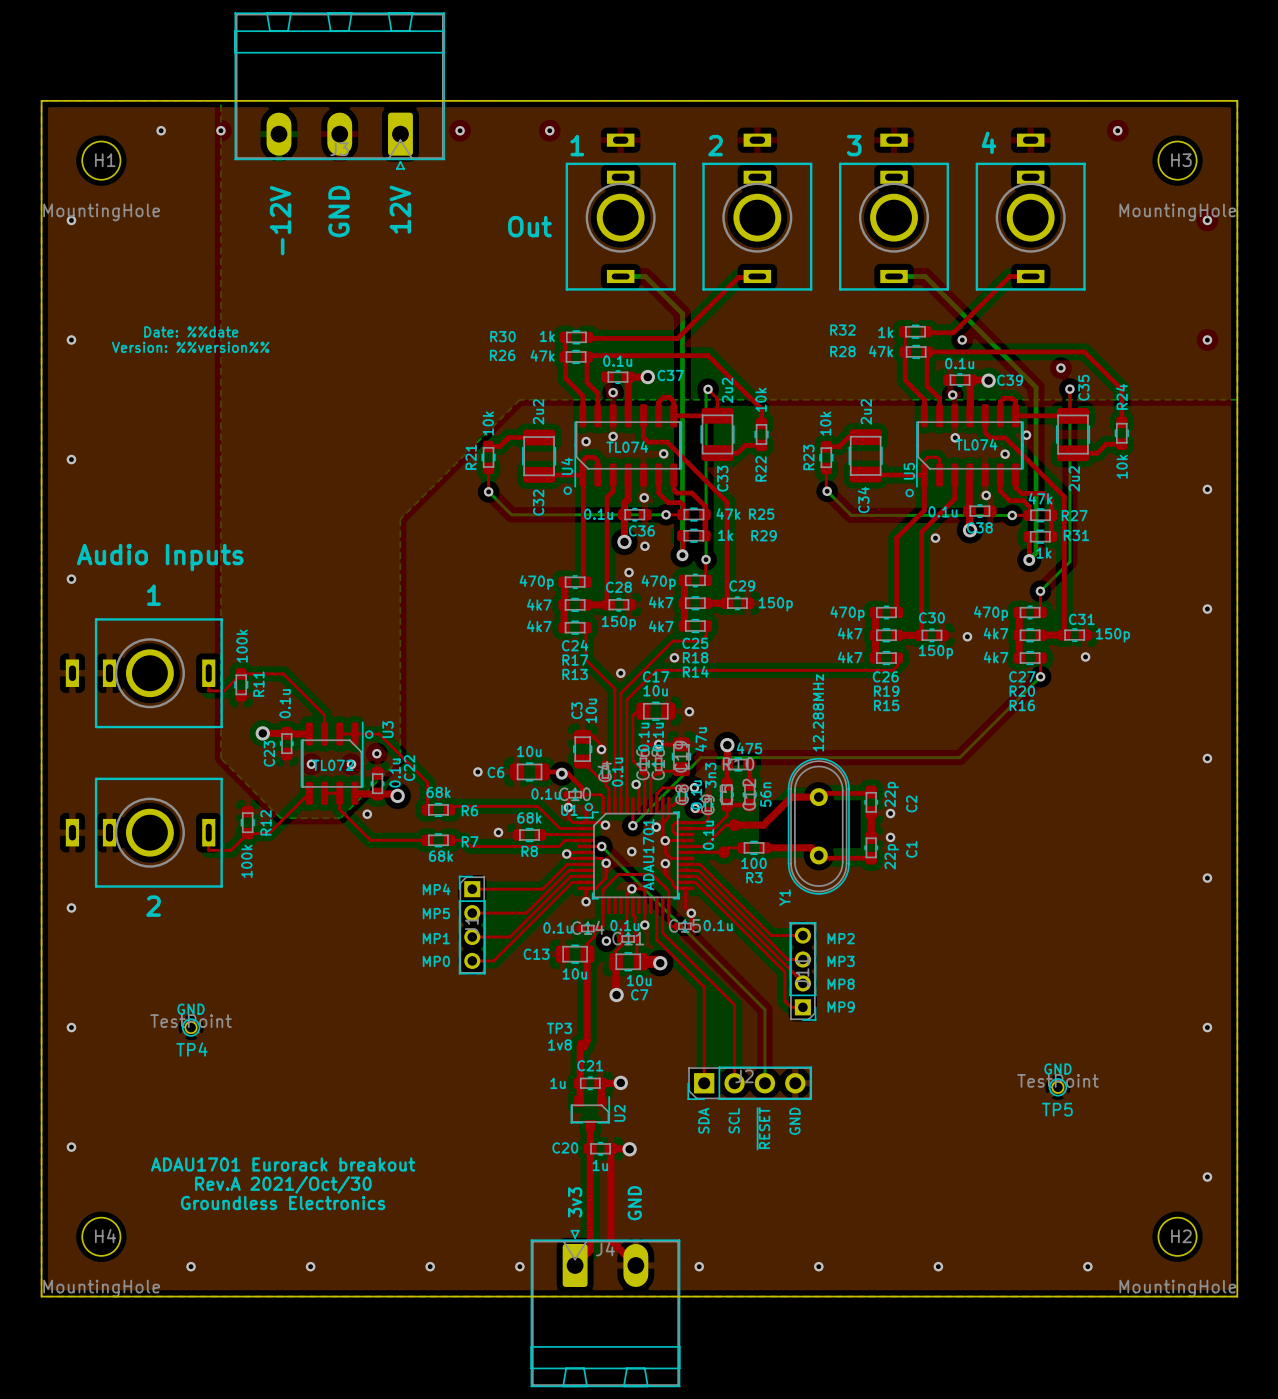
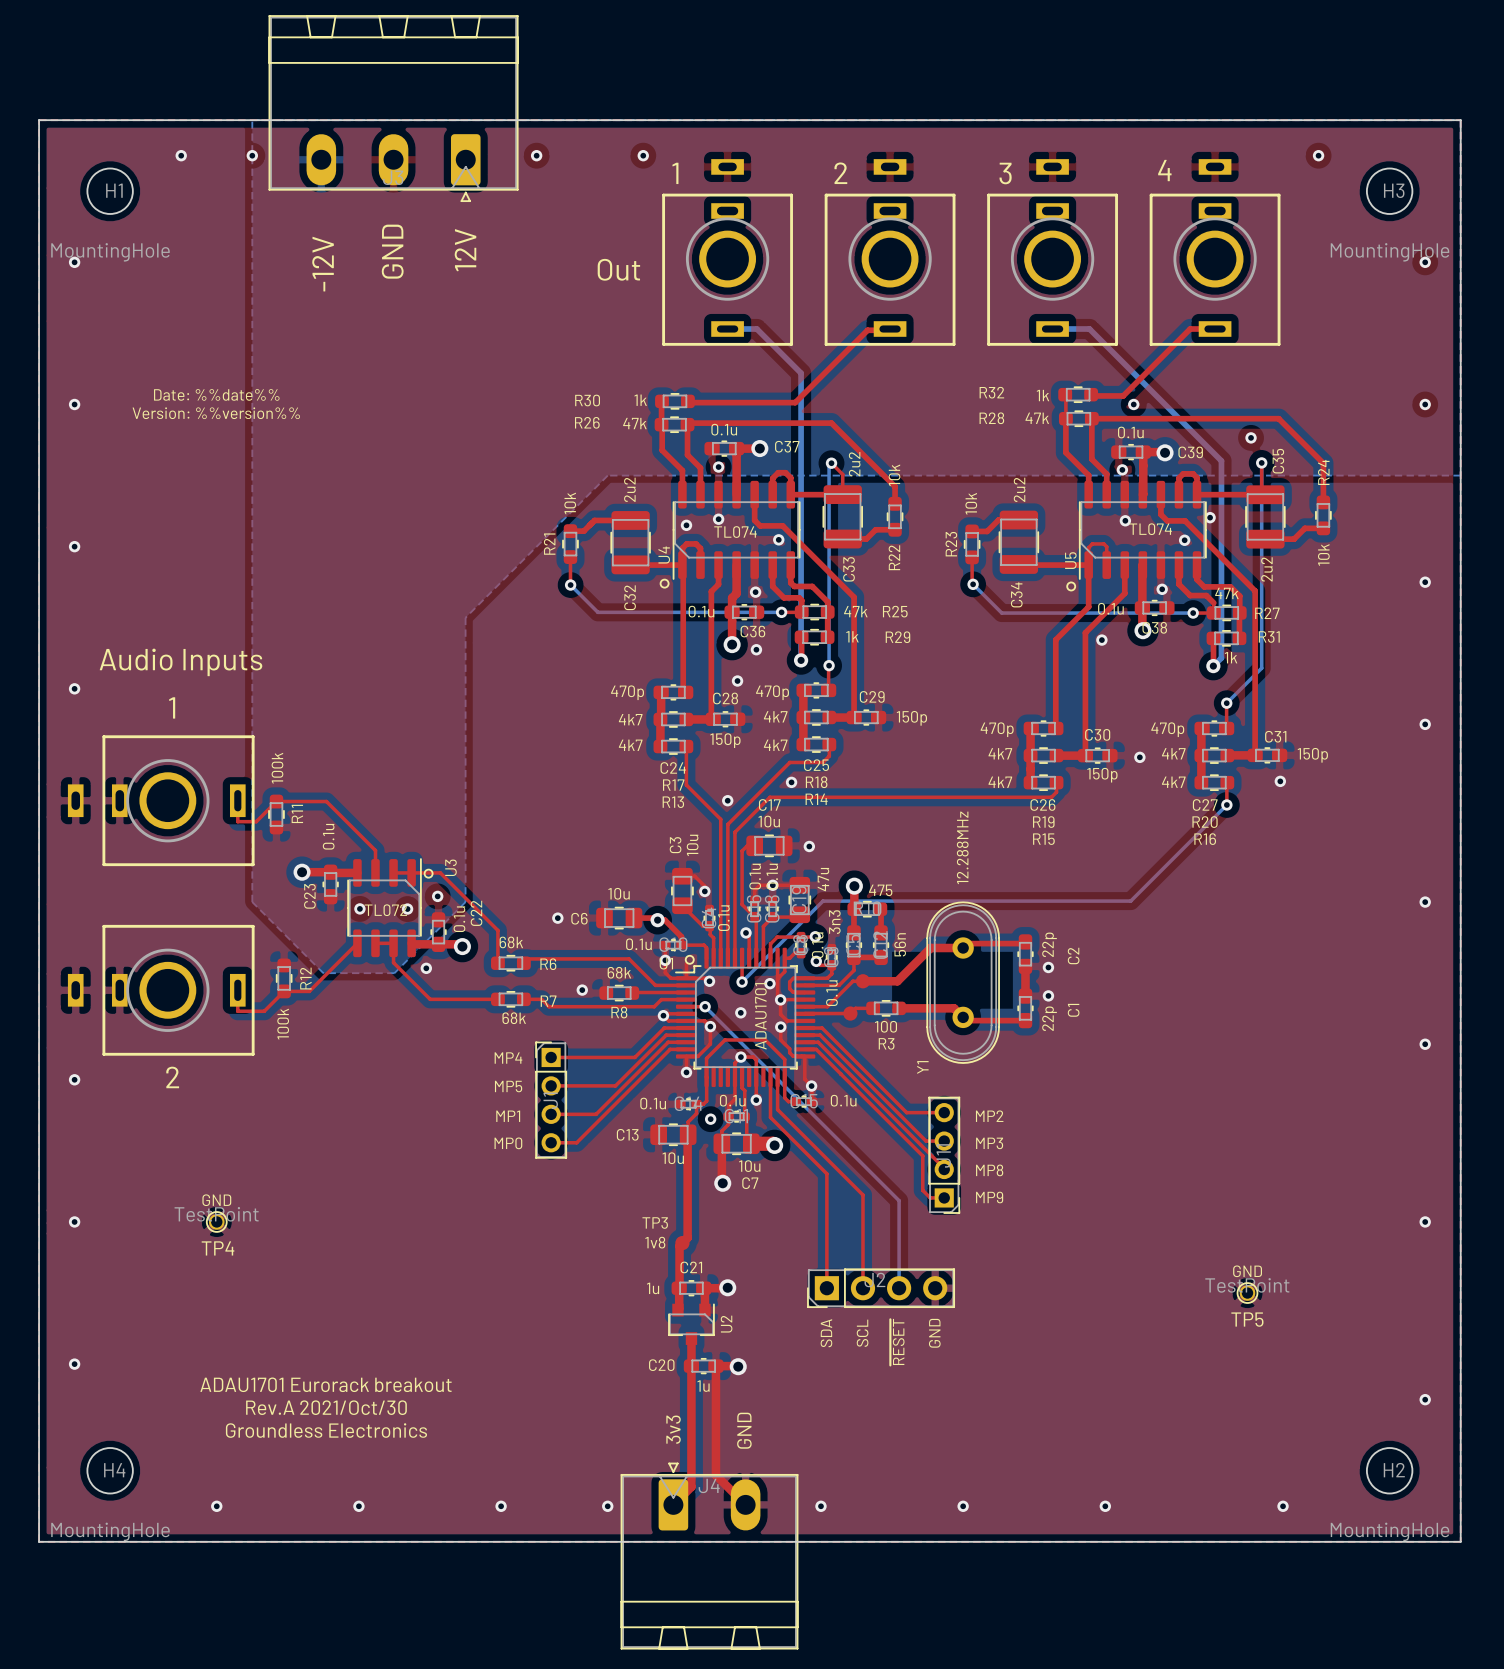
text: Date: %%date (191, 331) -> Date: %%date%% (216, 394)

